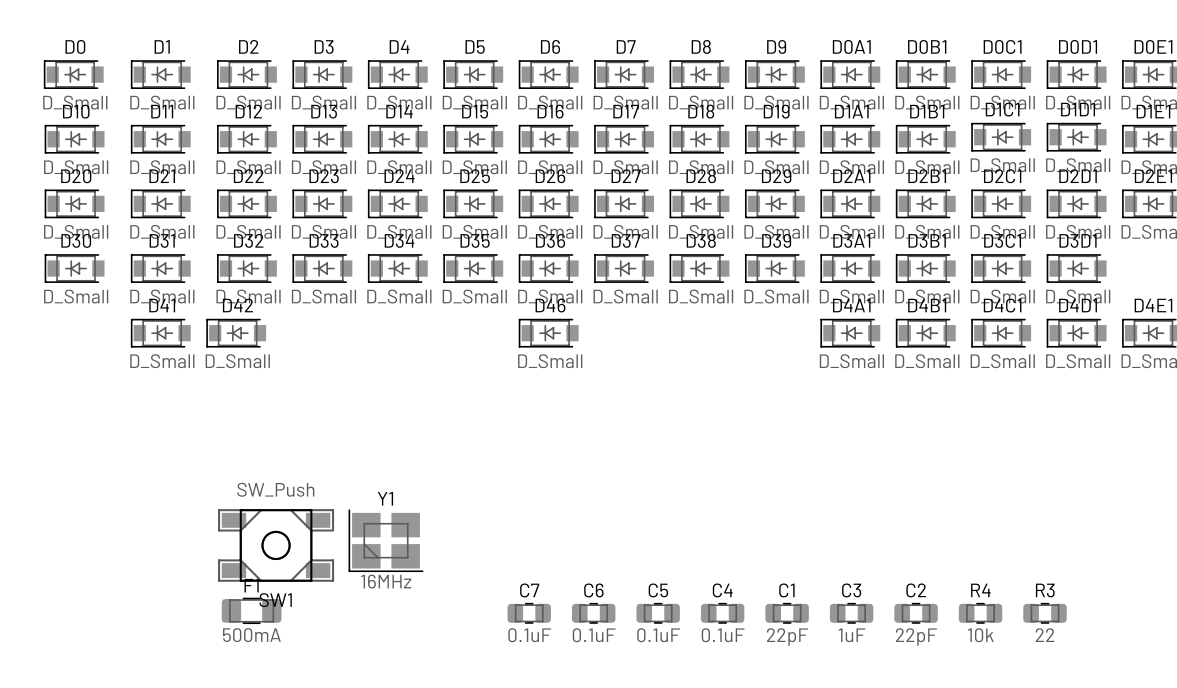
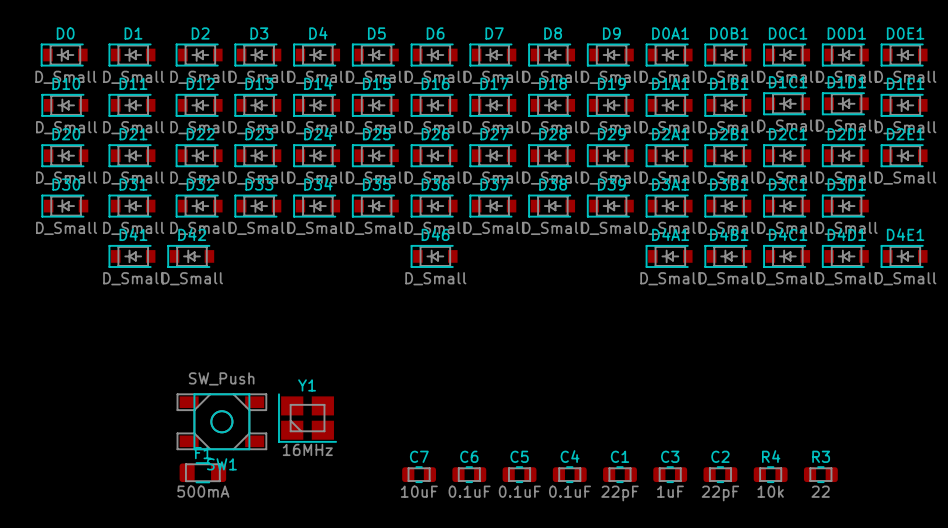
C7 value: 0.1uF (529, 635) -> 10uF (419, 491)

